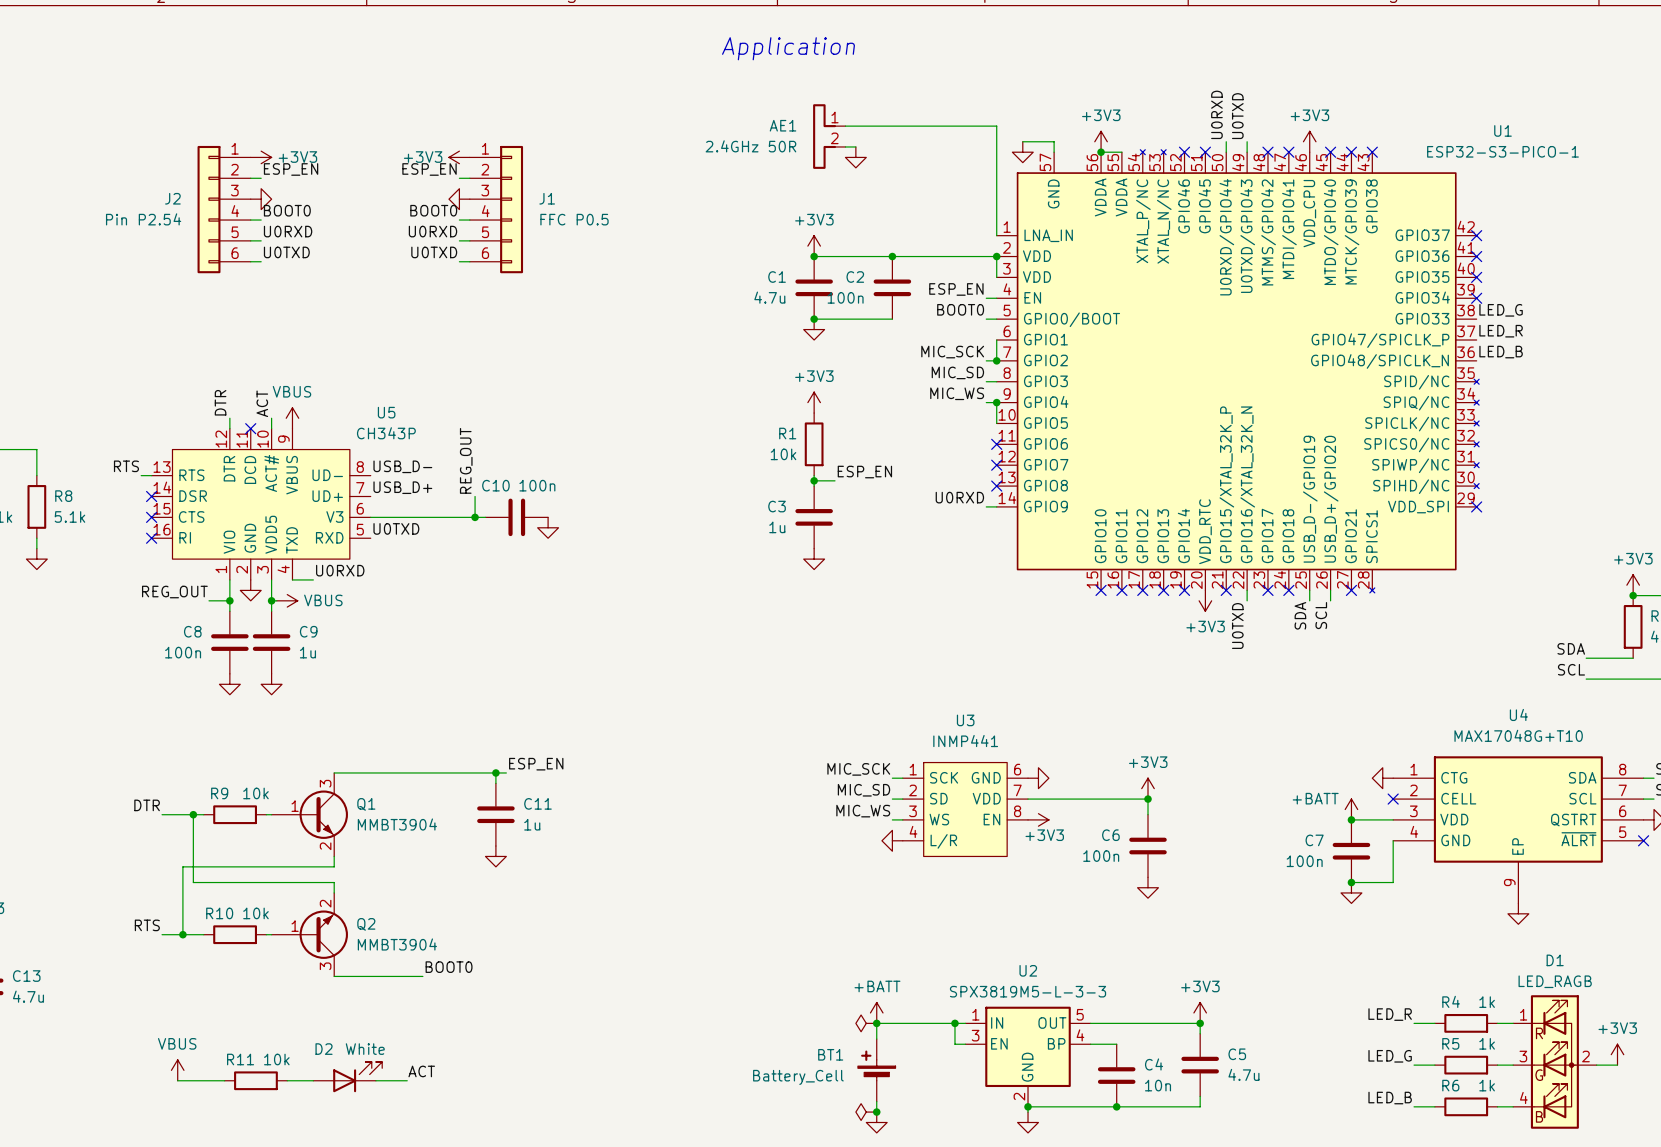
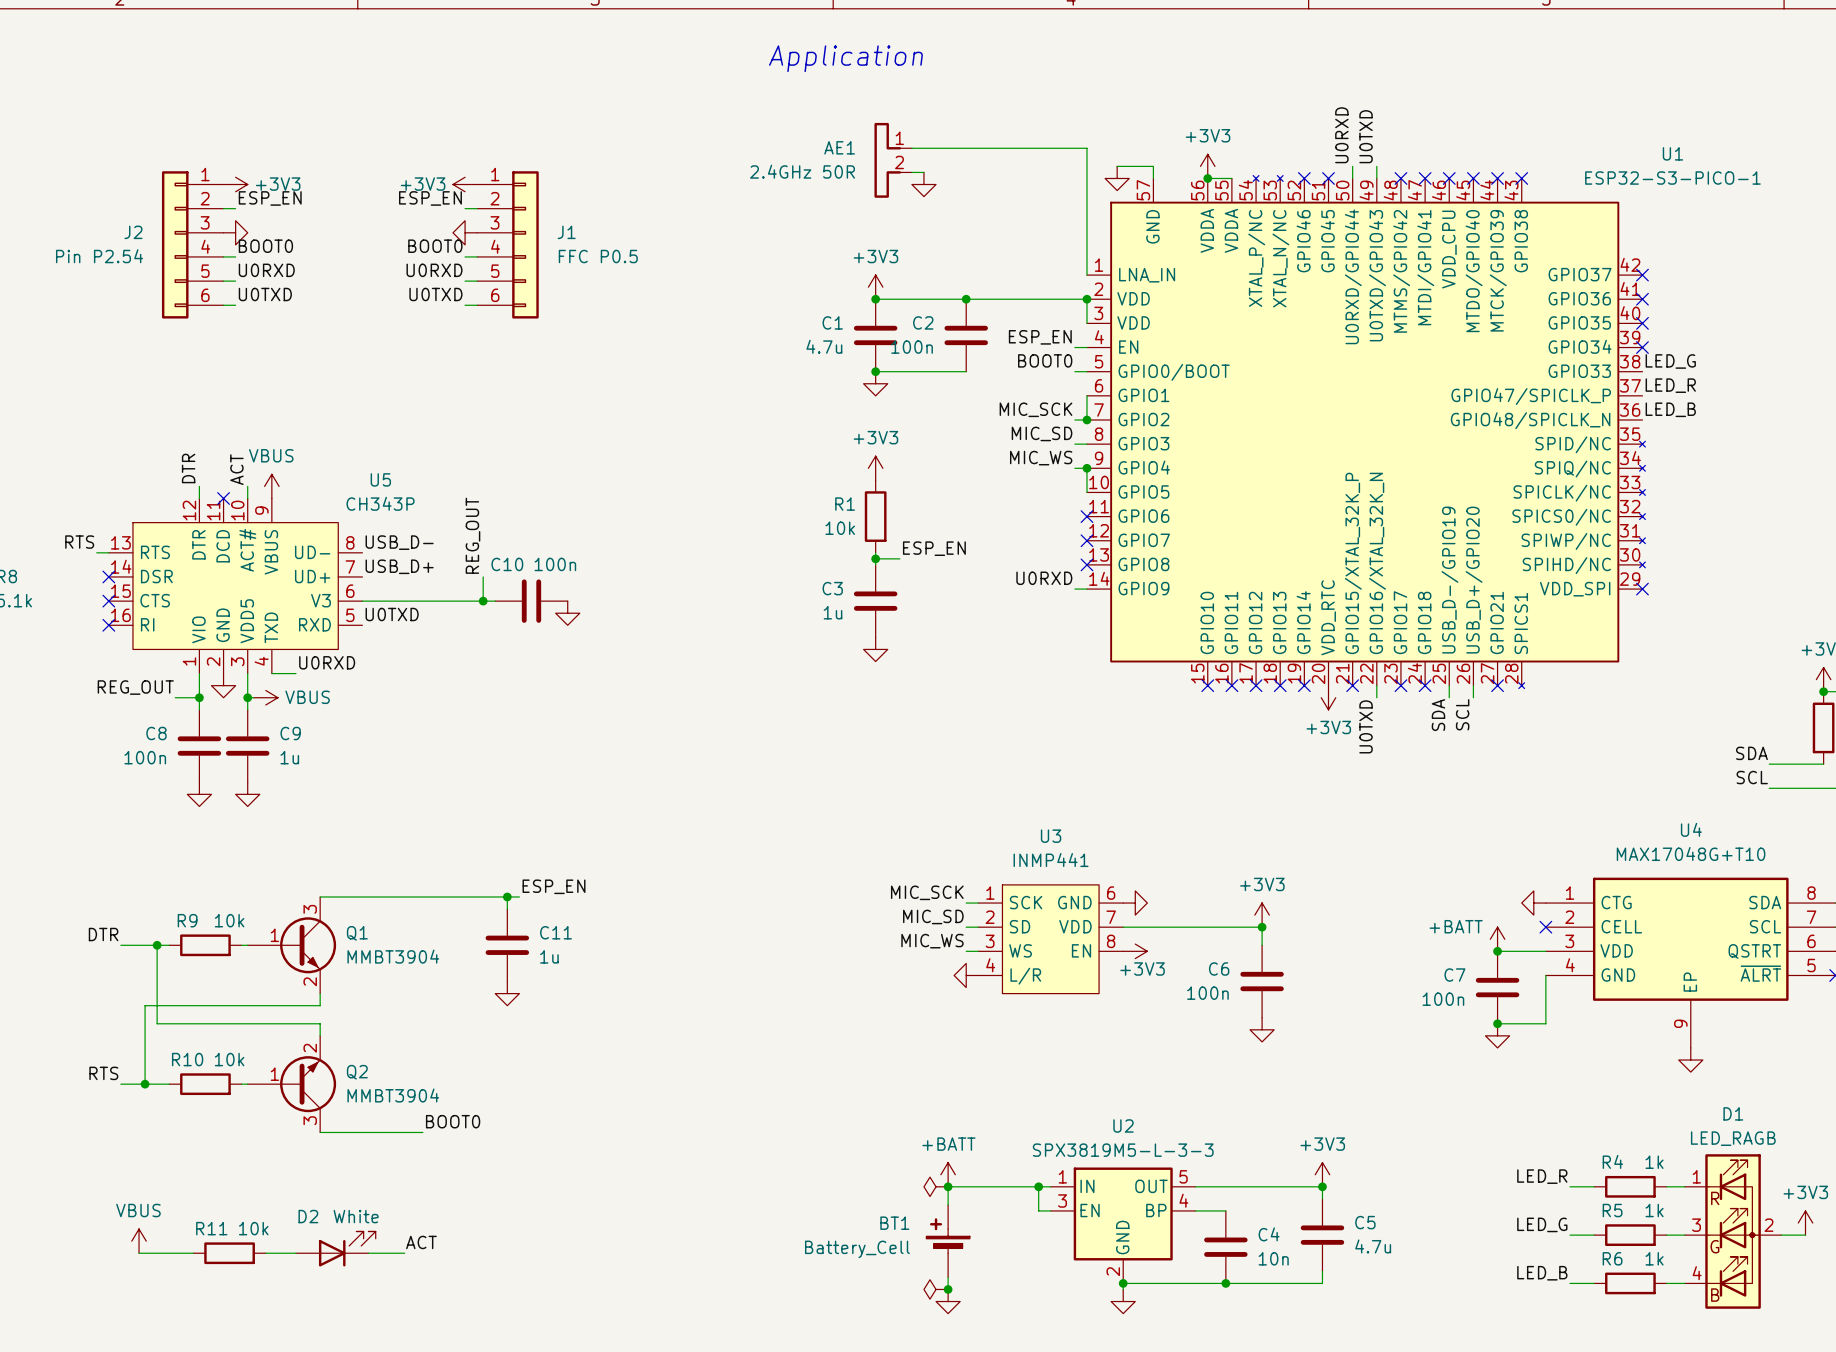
power symbol: +3V3 (1309, 141) -> none
no-connect mark: none -> (1449, 178)

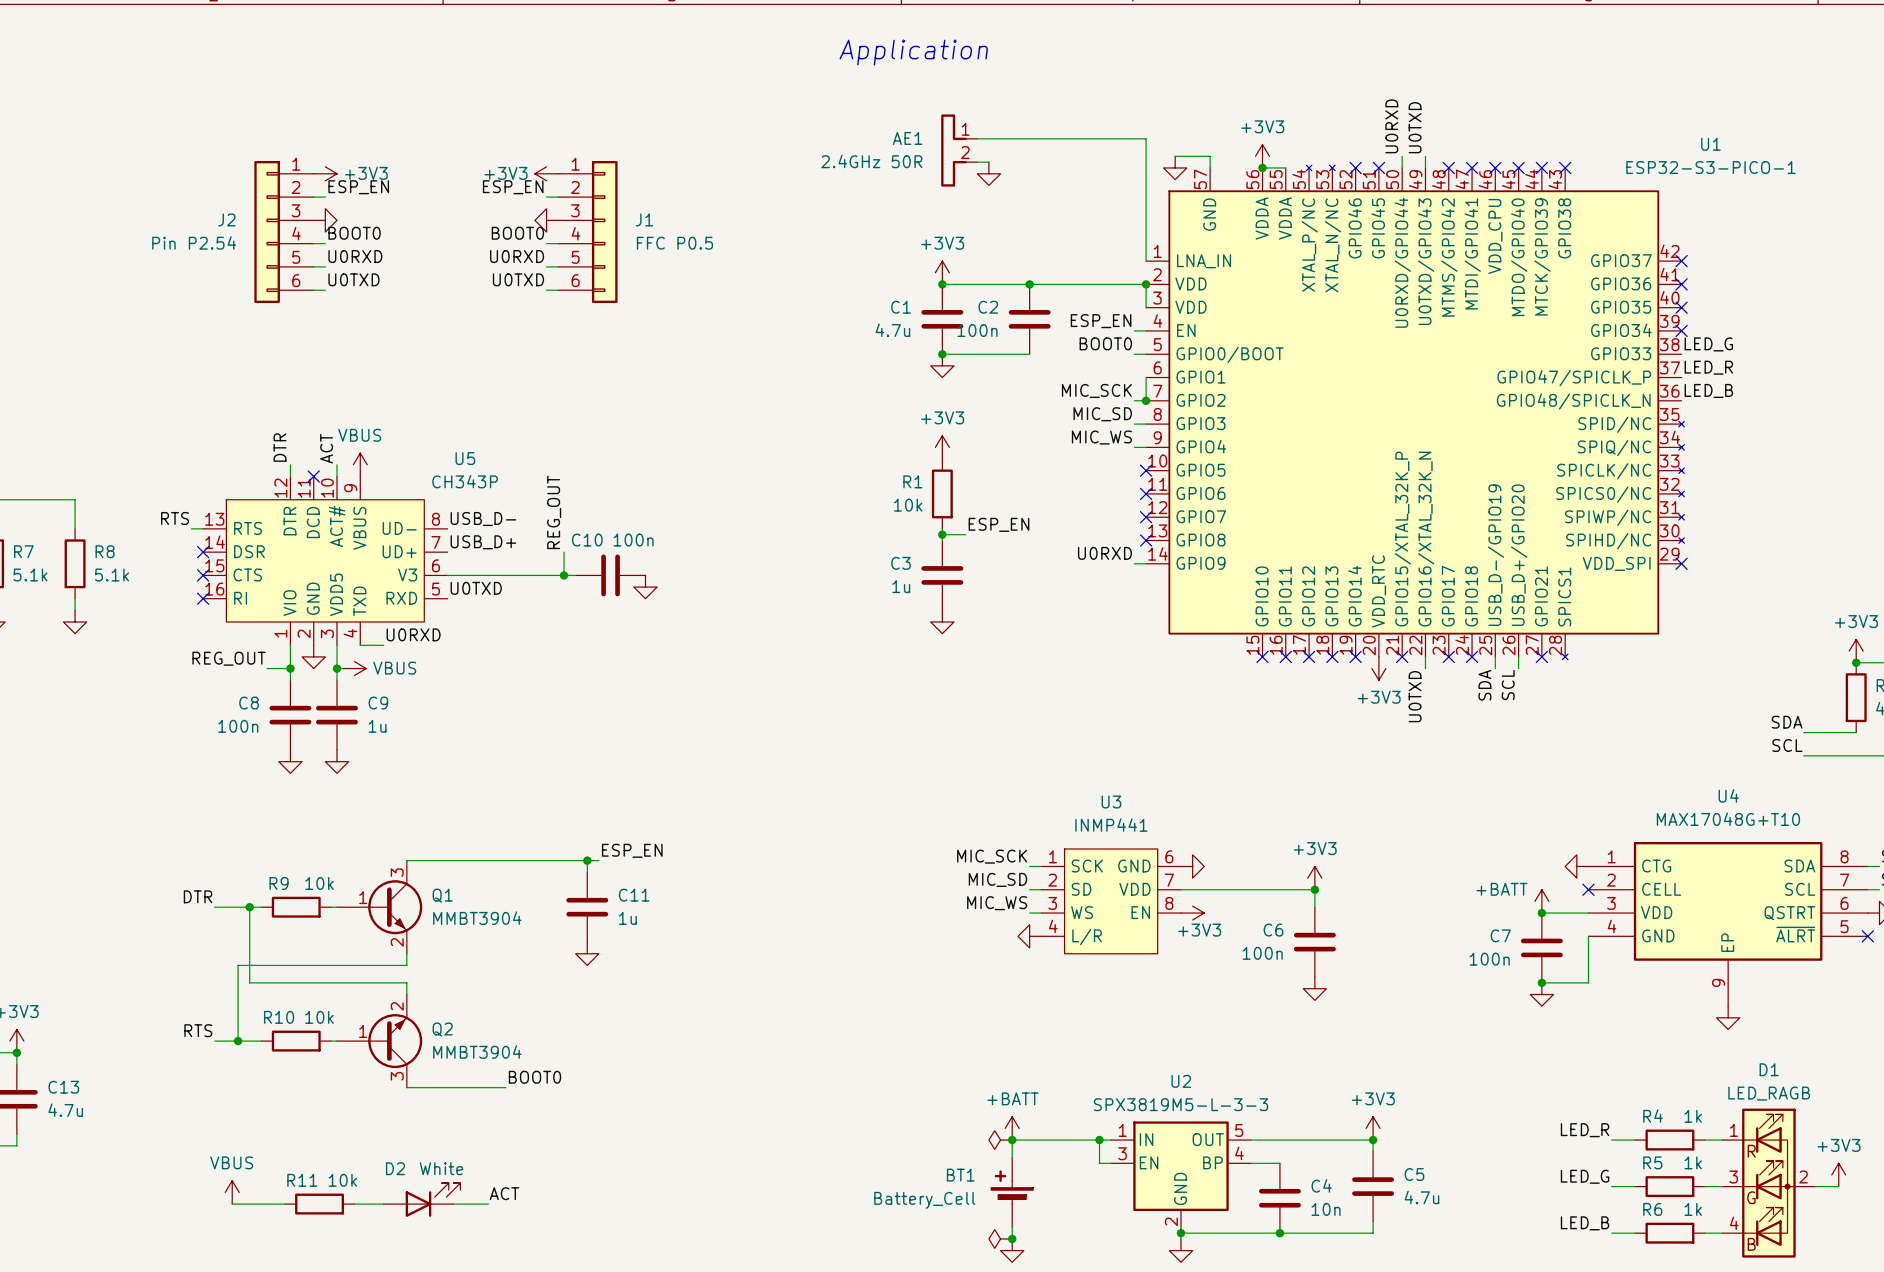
wire: (1086, 468) (1086, 492) -> none
junction: (1086, 468) -> none
no-connect mark: none -> (1146, 470)

